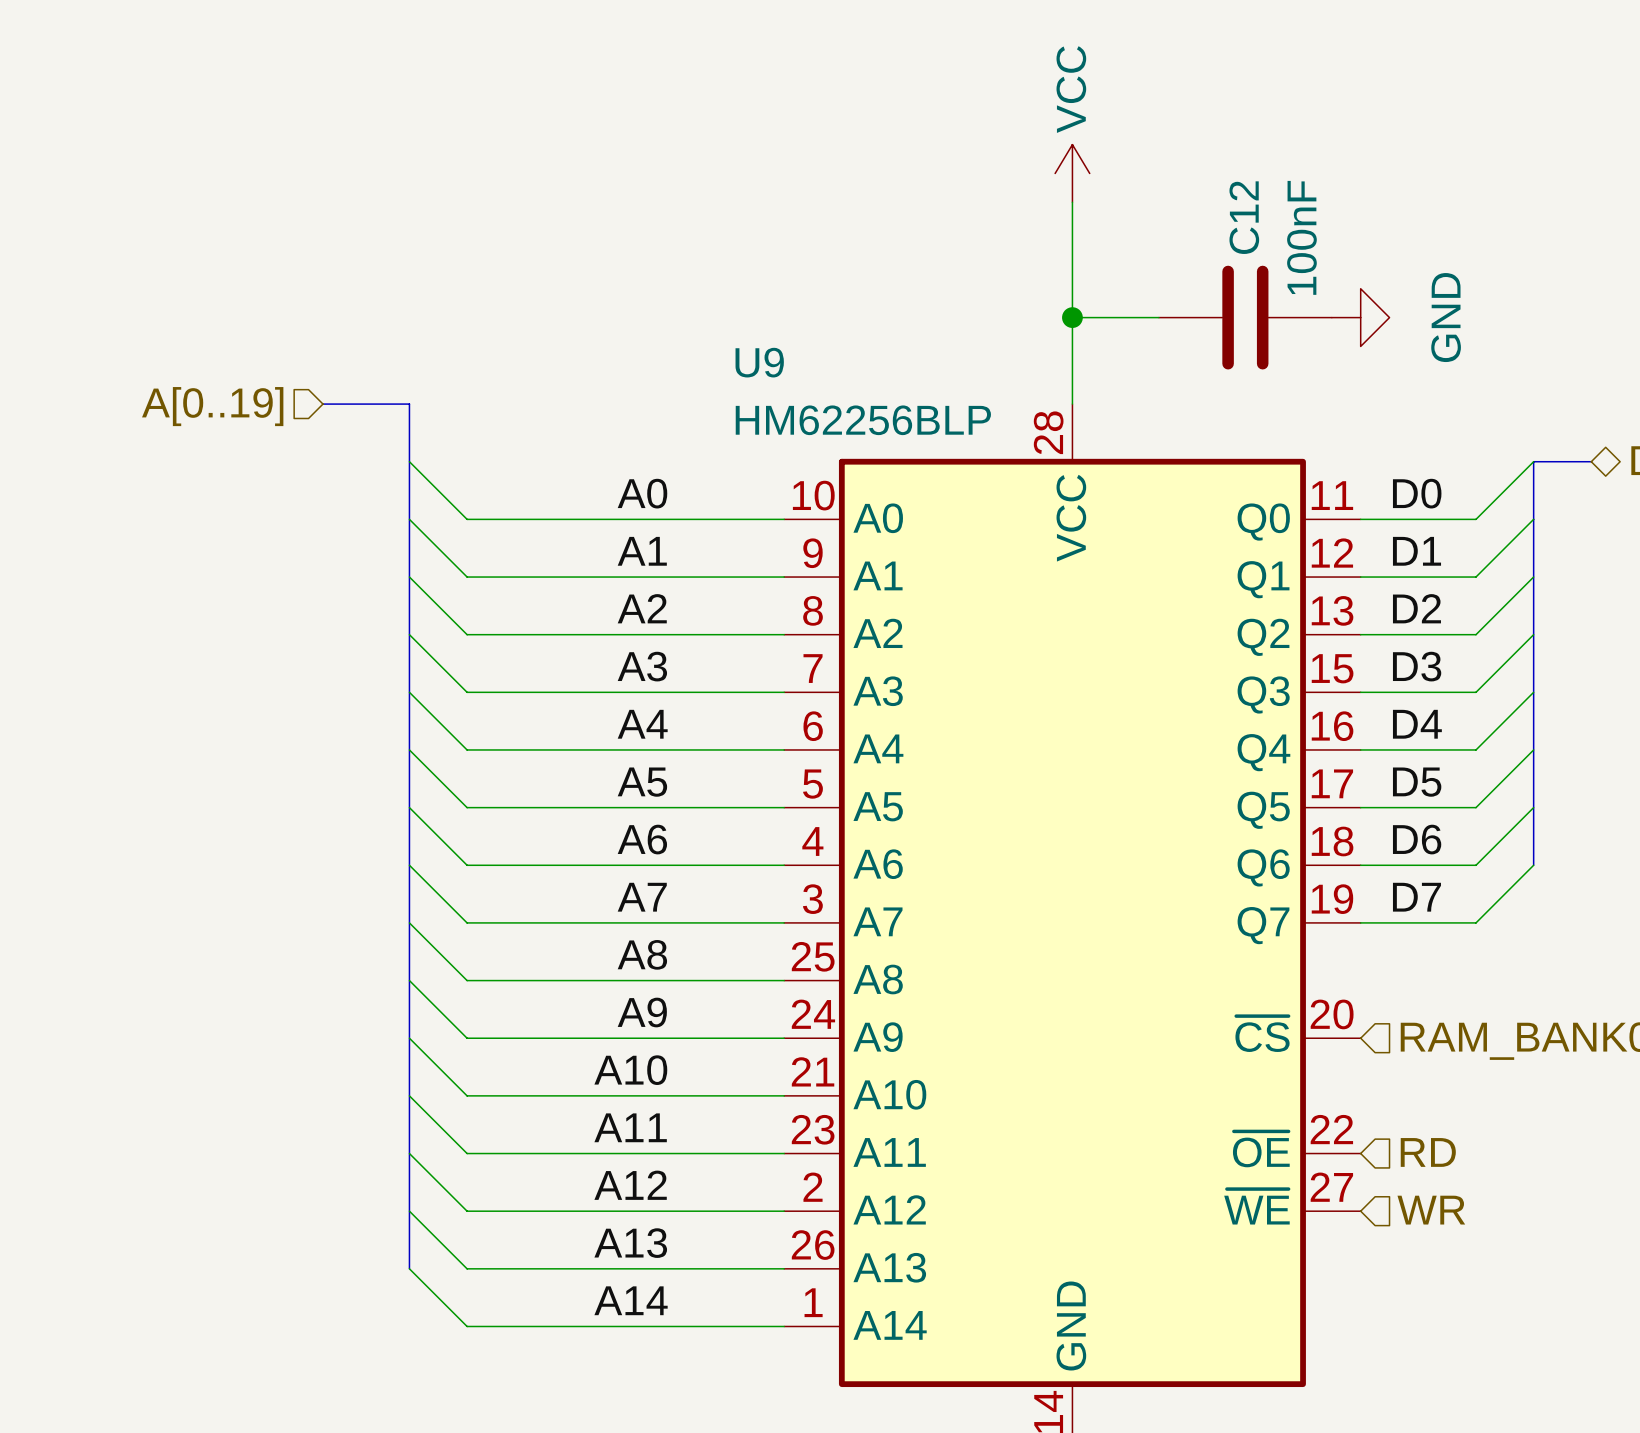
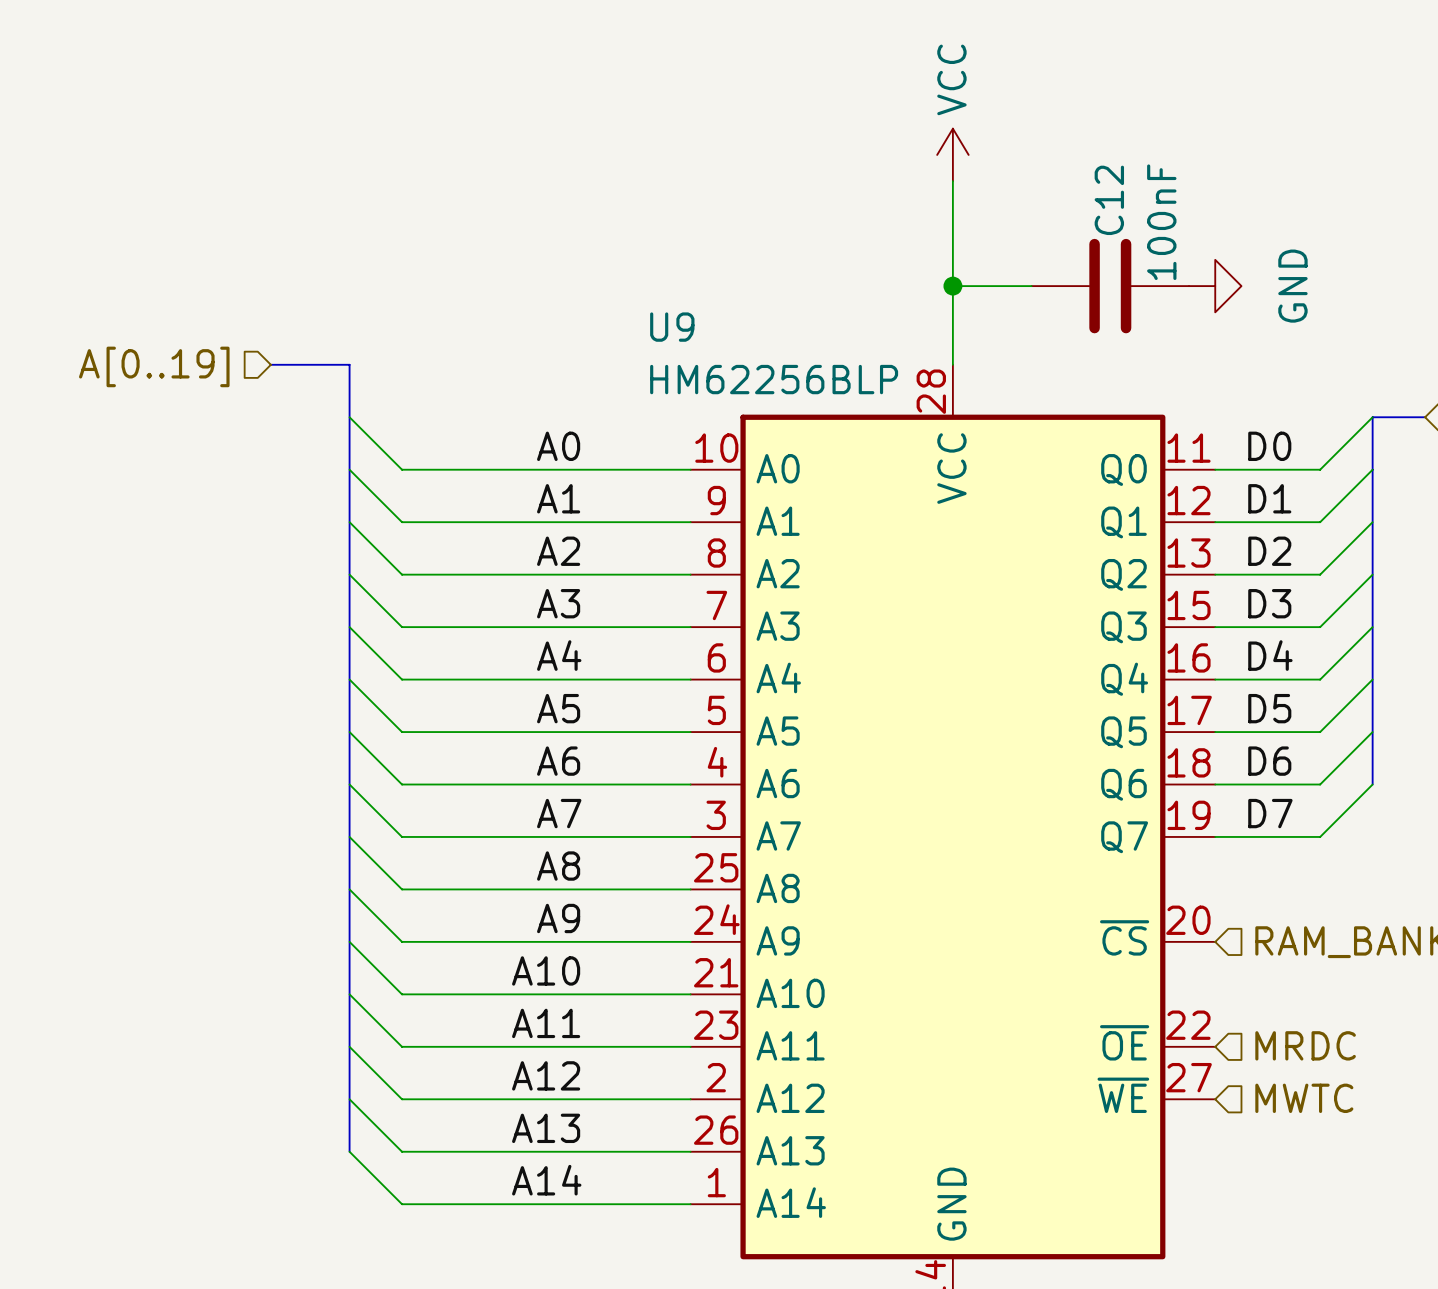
hierarchical label: RD (1428, 1152) -> MRDC (1305, 1045)
hierarchical label: WR (1431, 1210) -> MWTC (1304, 1098)

